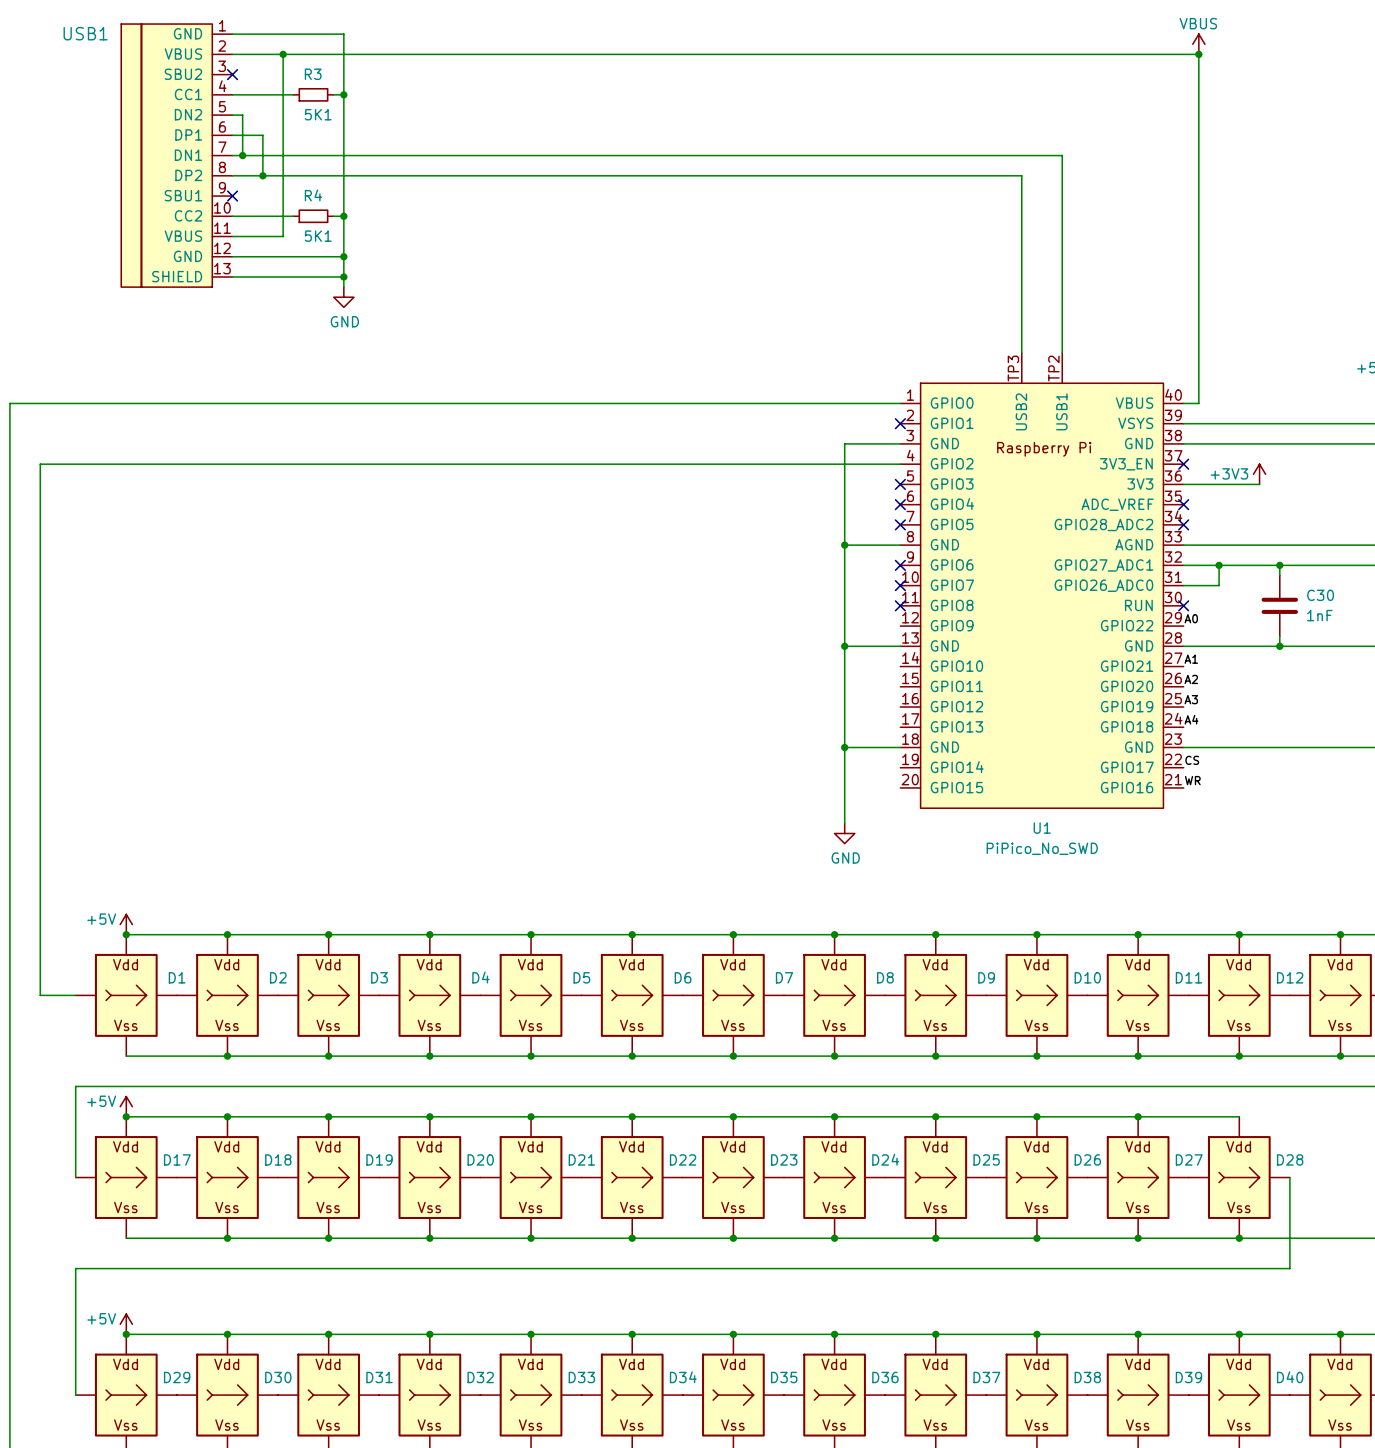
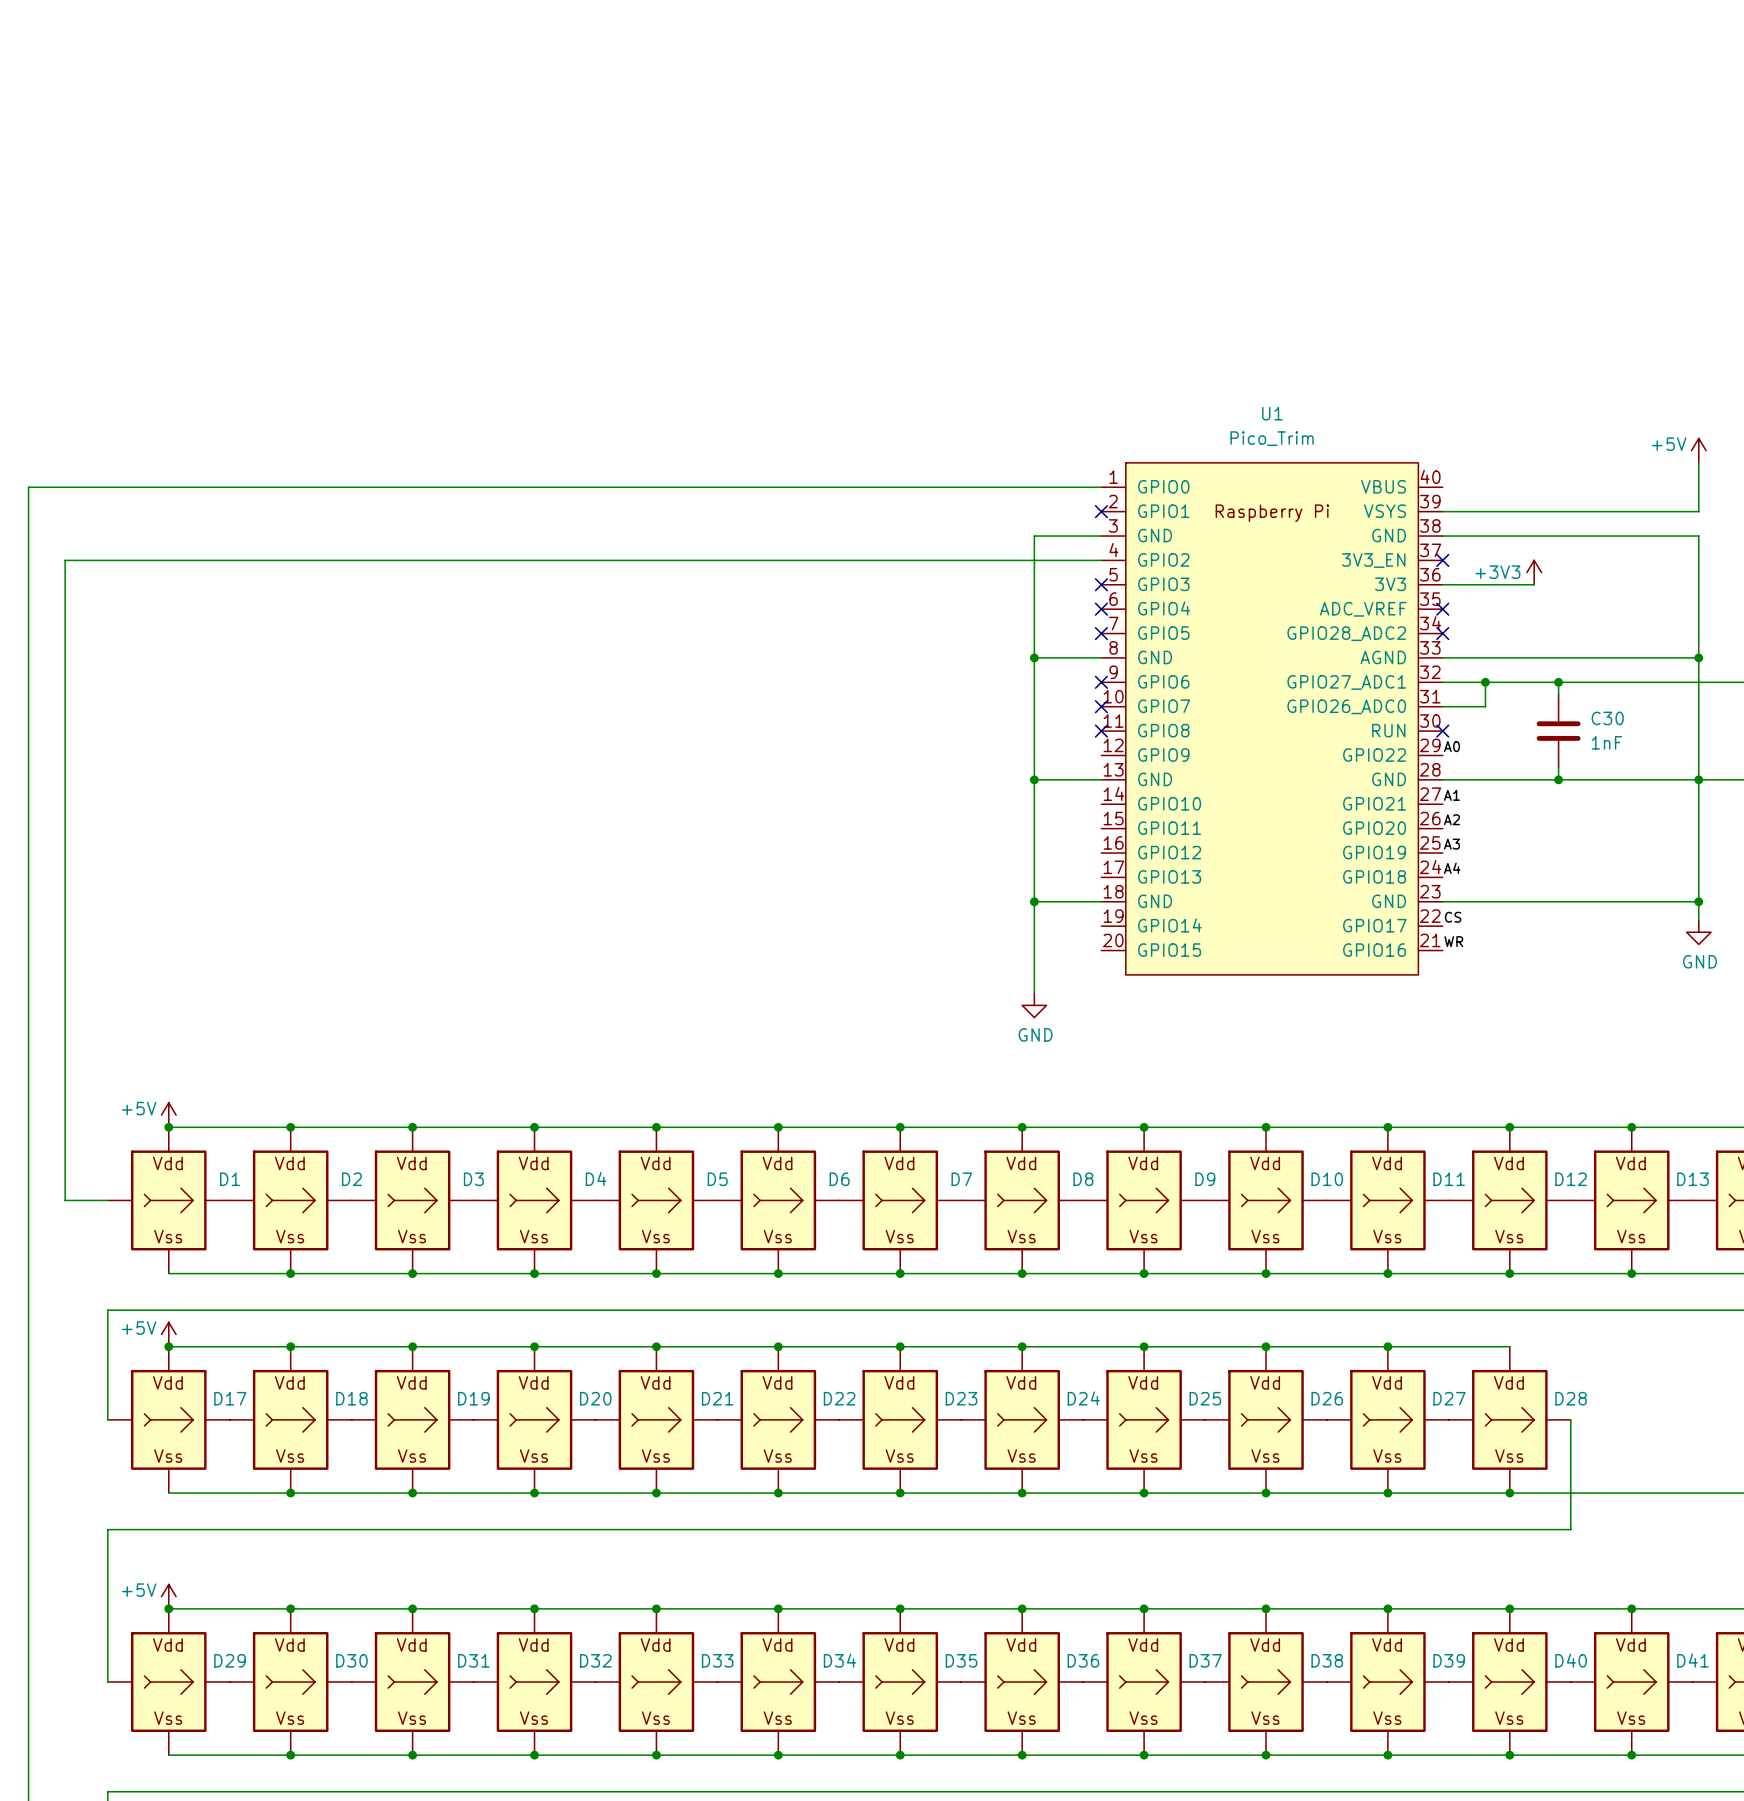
wire: (232, 34) (343, 34) (343, 287) -> none
power symbol: VBUS (1198, 44) -> none
wire: (232, 54) (1198, 54) (1198, 403) (1183, 403) -> none
wire: (283, 54) (283, 236) (232, 236) -> none
junction: (283, 54) -> none
junction: (1198, 54) -> none
no-connect mark: (232, 74) -> none
wire: (232, 94) (293, 94) -> none
R3: 5K1 (313, 94) -> none
wire: (333, 94) (343, 94) -> none
junction: (343, 94) -> none
wire: (232, 115) (242, 115) (242, 155) -> none
wire: (232, 135) (262, 135) (262, 175) -> none
USB1: (176, 155) -> none
wire: (232, 155) (1062, 155) (1062, 352) -> none
junction: (242, 155) -> none
wire: (232, 175) (1021, 175) (1021, 352) -> none
junction: (262, 175) -> none
no-connect mark: (232, 196) -> none
wire: (232, 216) (293, 216) -> none
R4: 5K1 (313, 216) -> none
wire: (333, 216) (343, 216) -> none
junction: (343, 216) -> none
wire: (232, 256) (343, 256) -> none
junction: (343, 256) -> none
wire: (232, 276) (343, 276) -> none
junction: (343, 276) -> none
power symbol: GND (343, 297) -> none
U1 symbol: [900, 352, 1184, 809] -> [1101, 462, 1443, 975]
U1 name position: U1 (1042, 828) -> U1 (1272, 413)
U1 value: PiPico_No_SWD (1042, 848) -> Pico_Trim (1272, 438)

